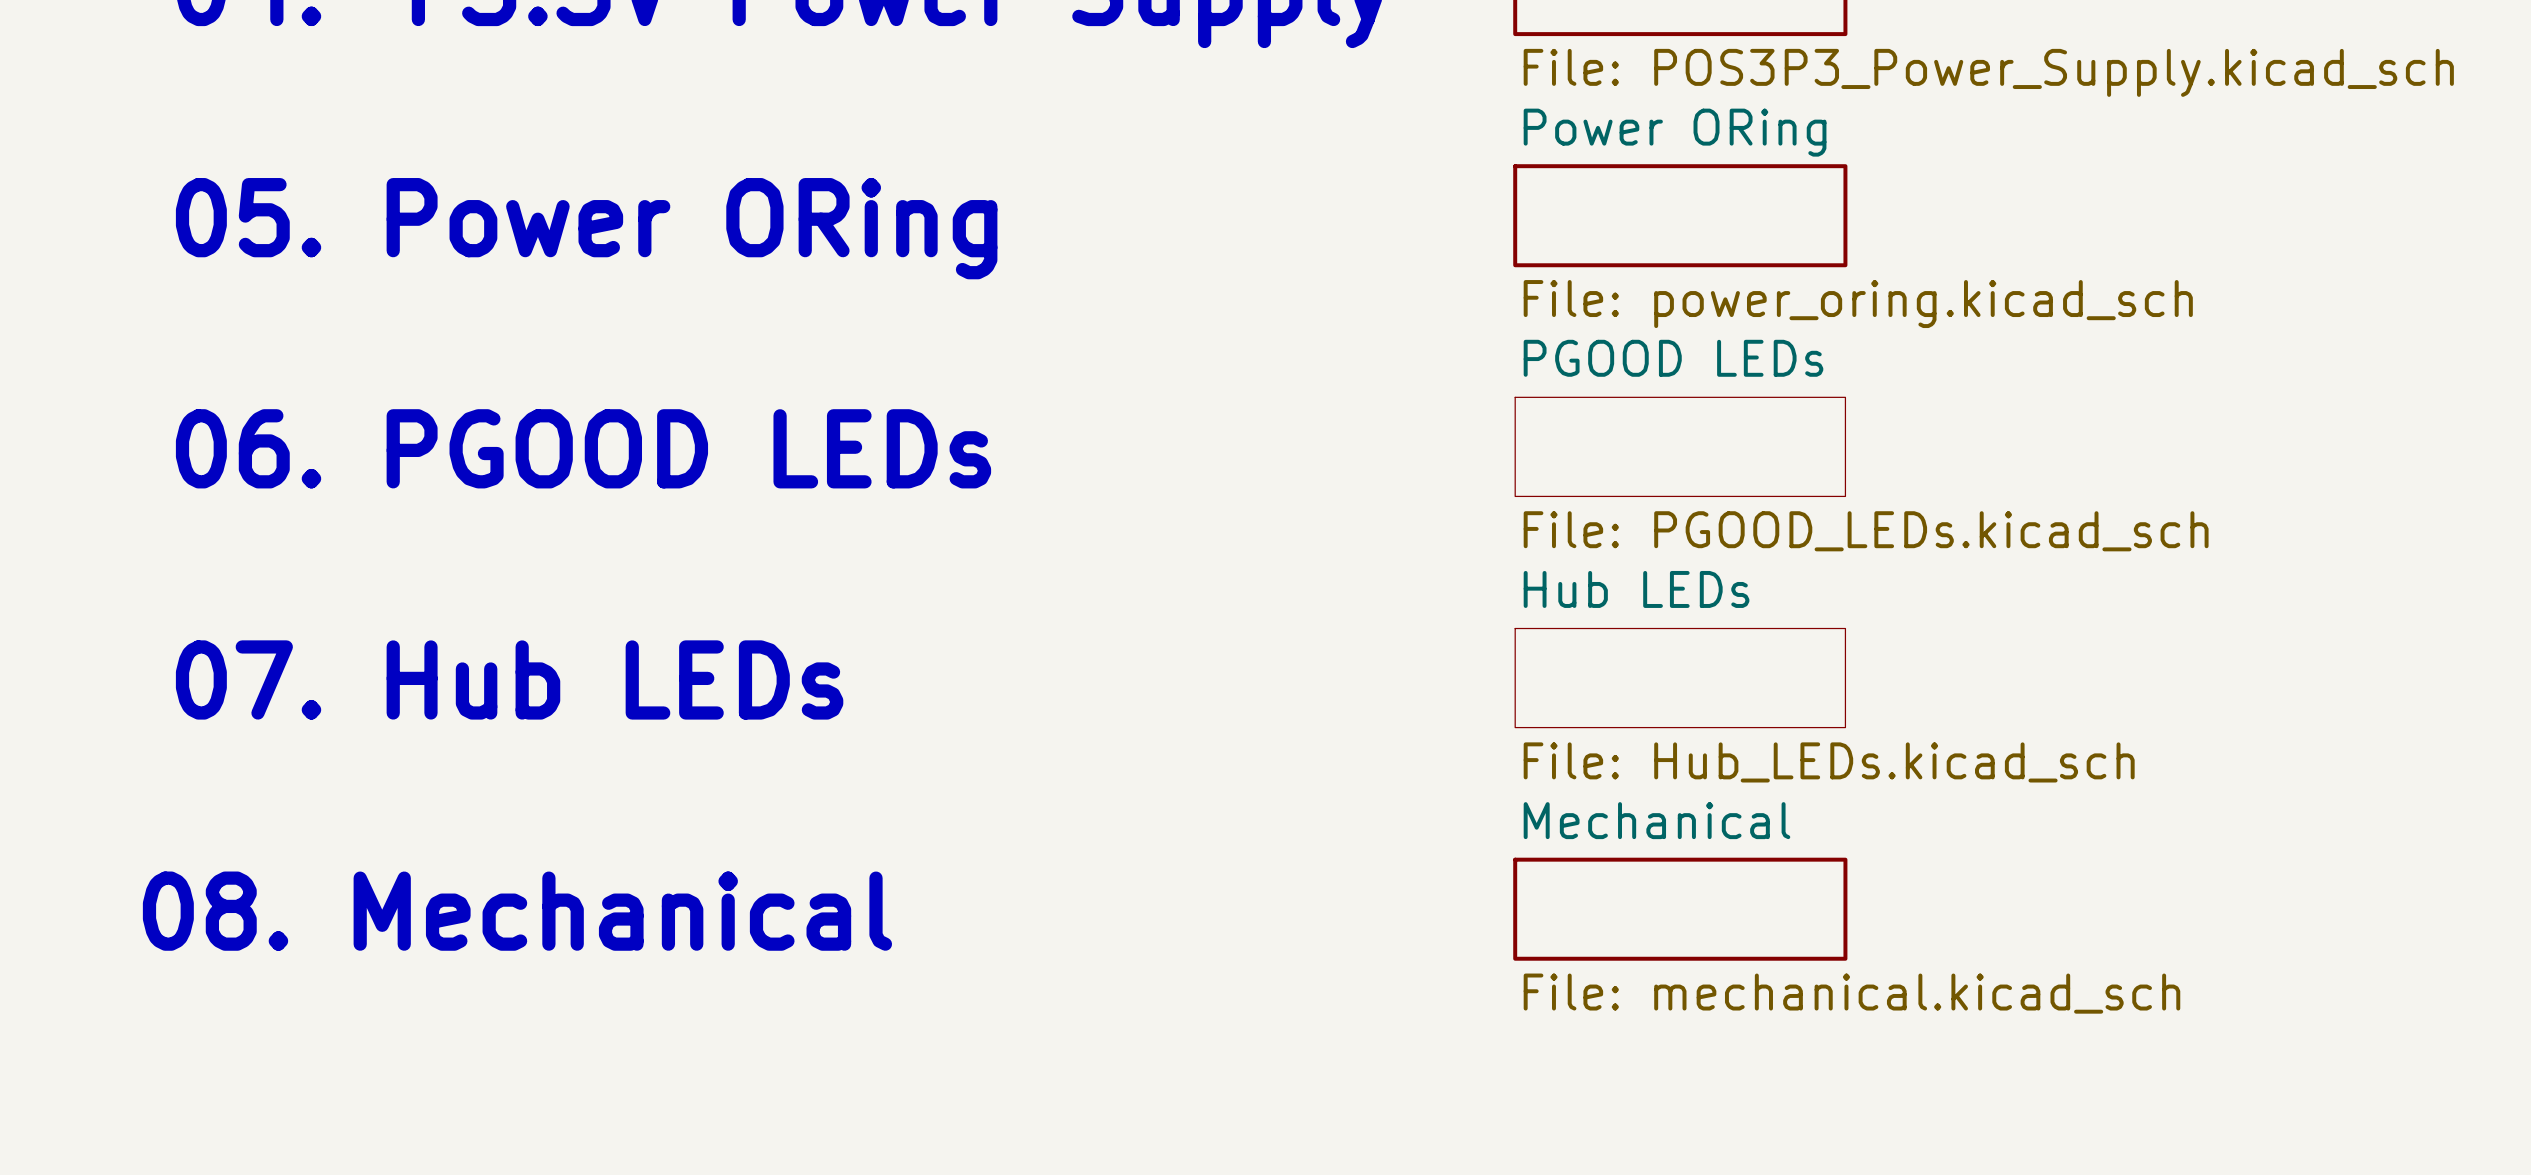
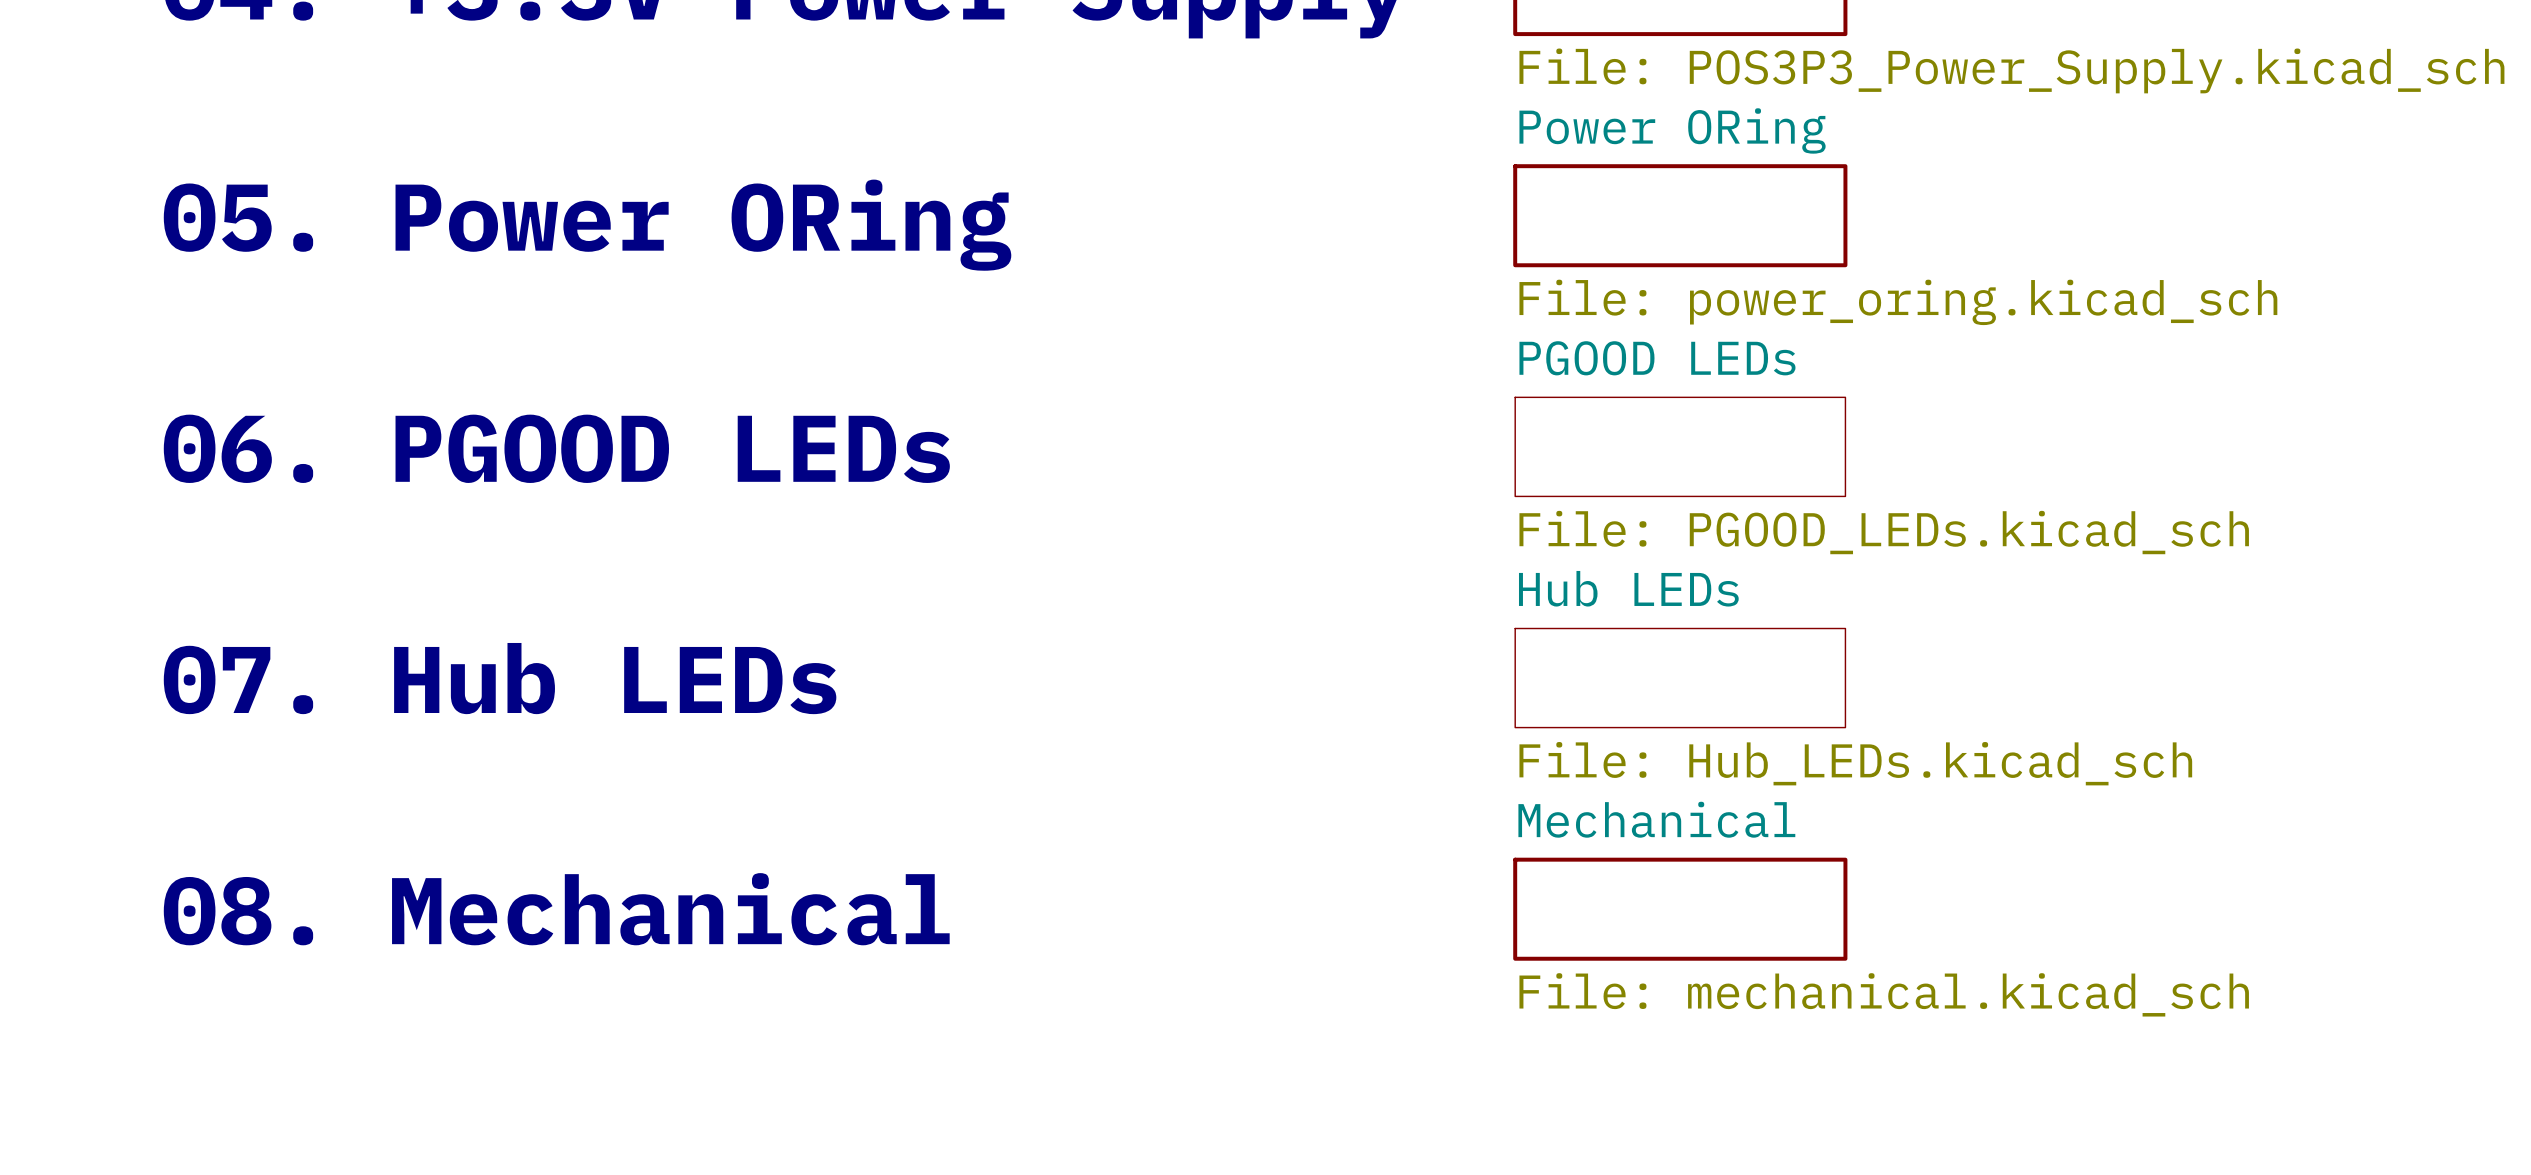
text position: 08. Mechanical (517, 911) -> 08. Mechanical (556, 909)

